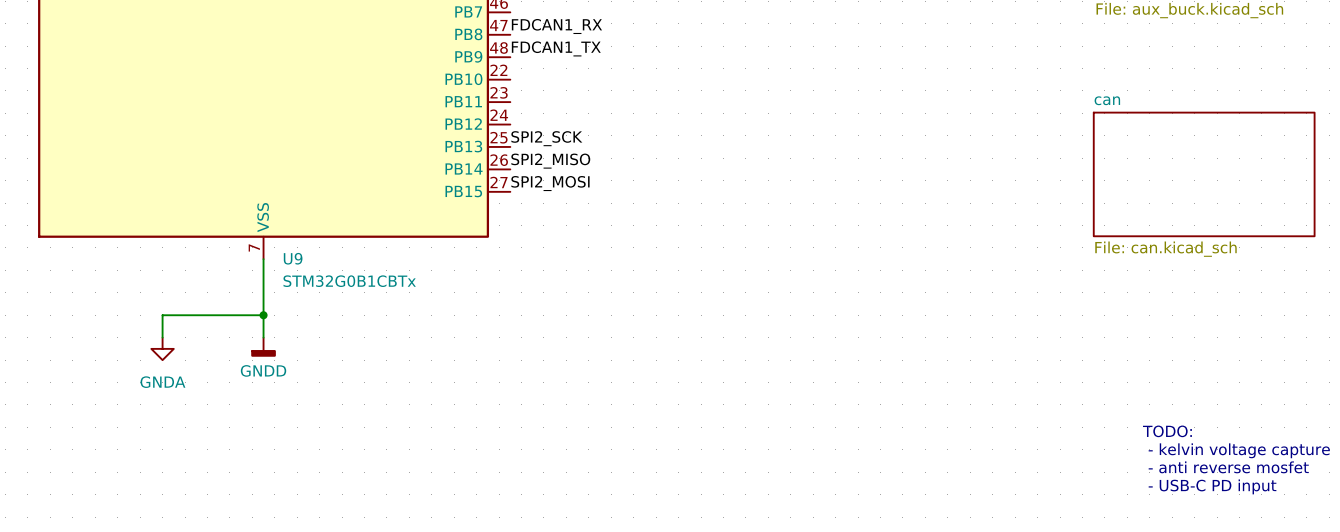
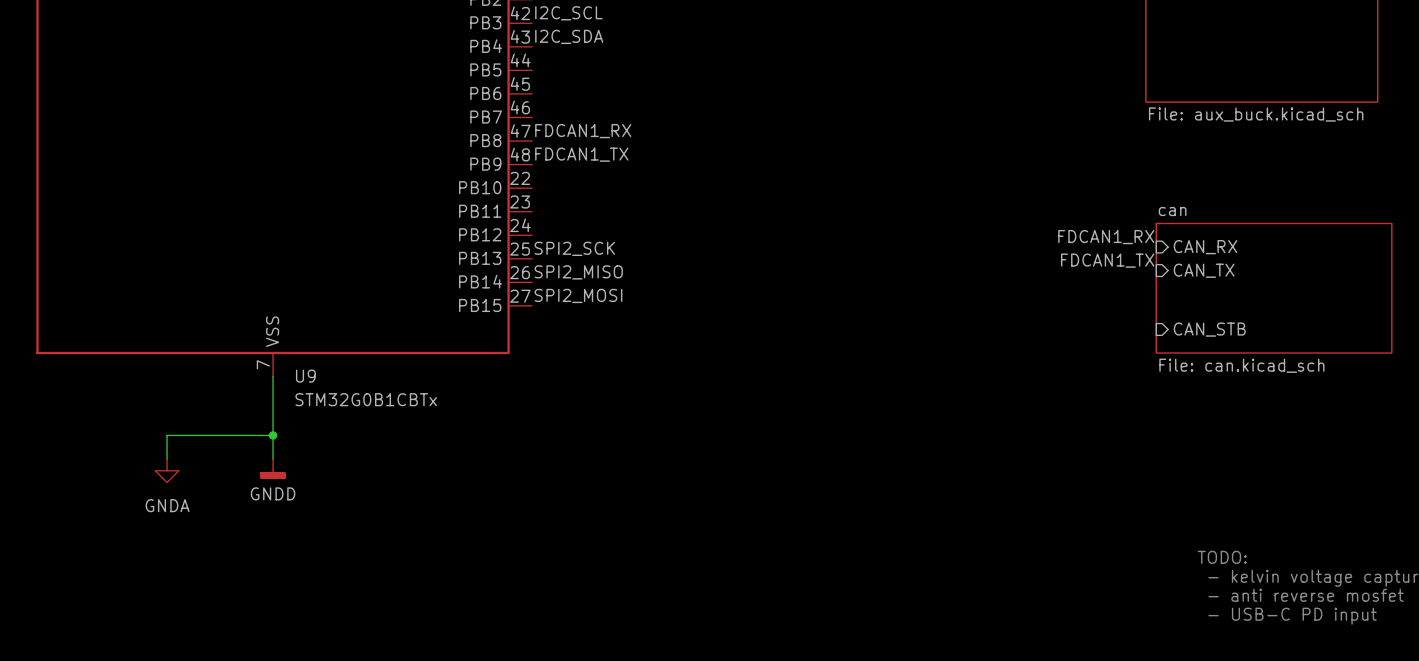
label: none -> FDCAN1_RX (1106, 237)
sheet pin: none -> CAN_RX (1205, 247)
label: none -> FDCAN1_TX (1107, 260)
sheet pin: none -> CAN_TX (1204, 270)
sheet can: File: can.kicad_sch (1204, 174) -> none
sheet can: none -> File: can.kicad_sch (1274, 288)
sheet pin: none -> CAN_STB (1209, 329)

